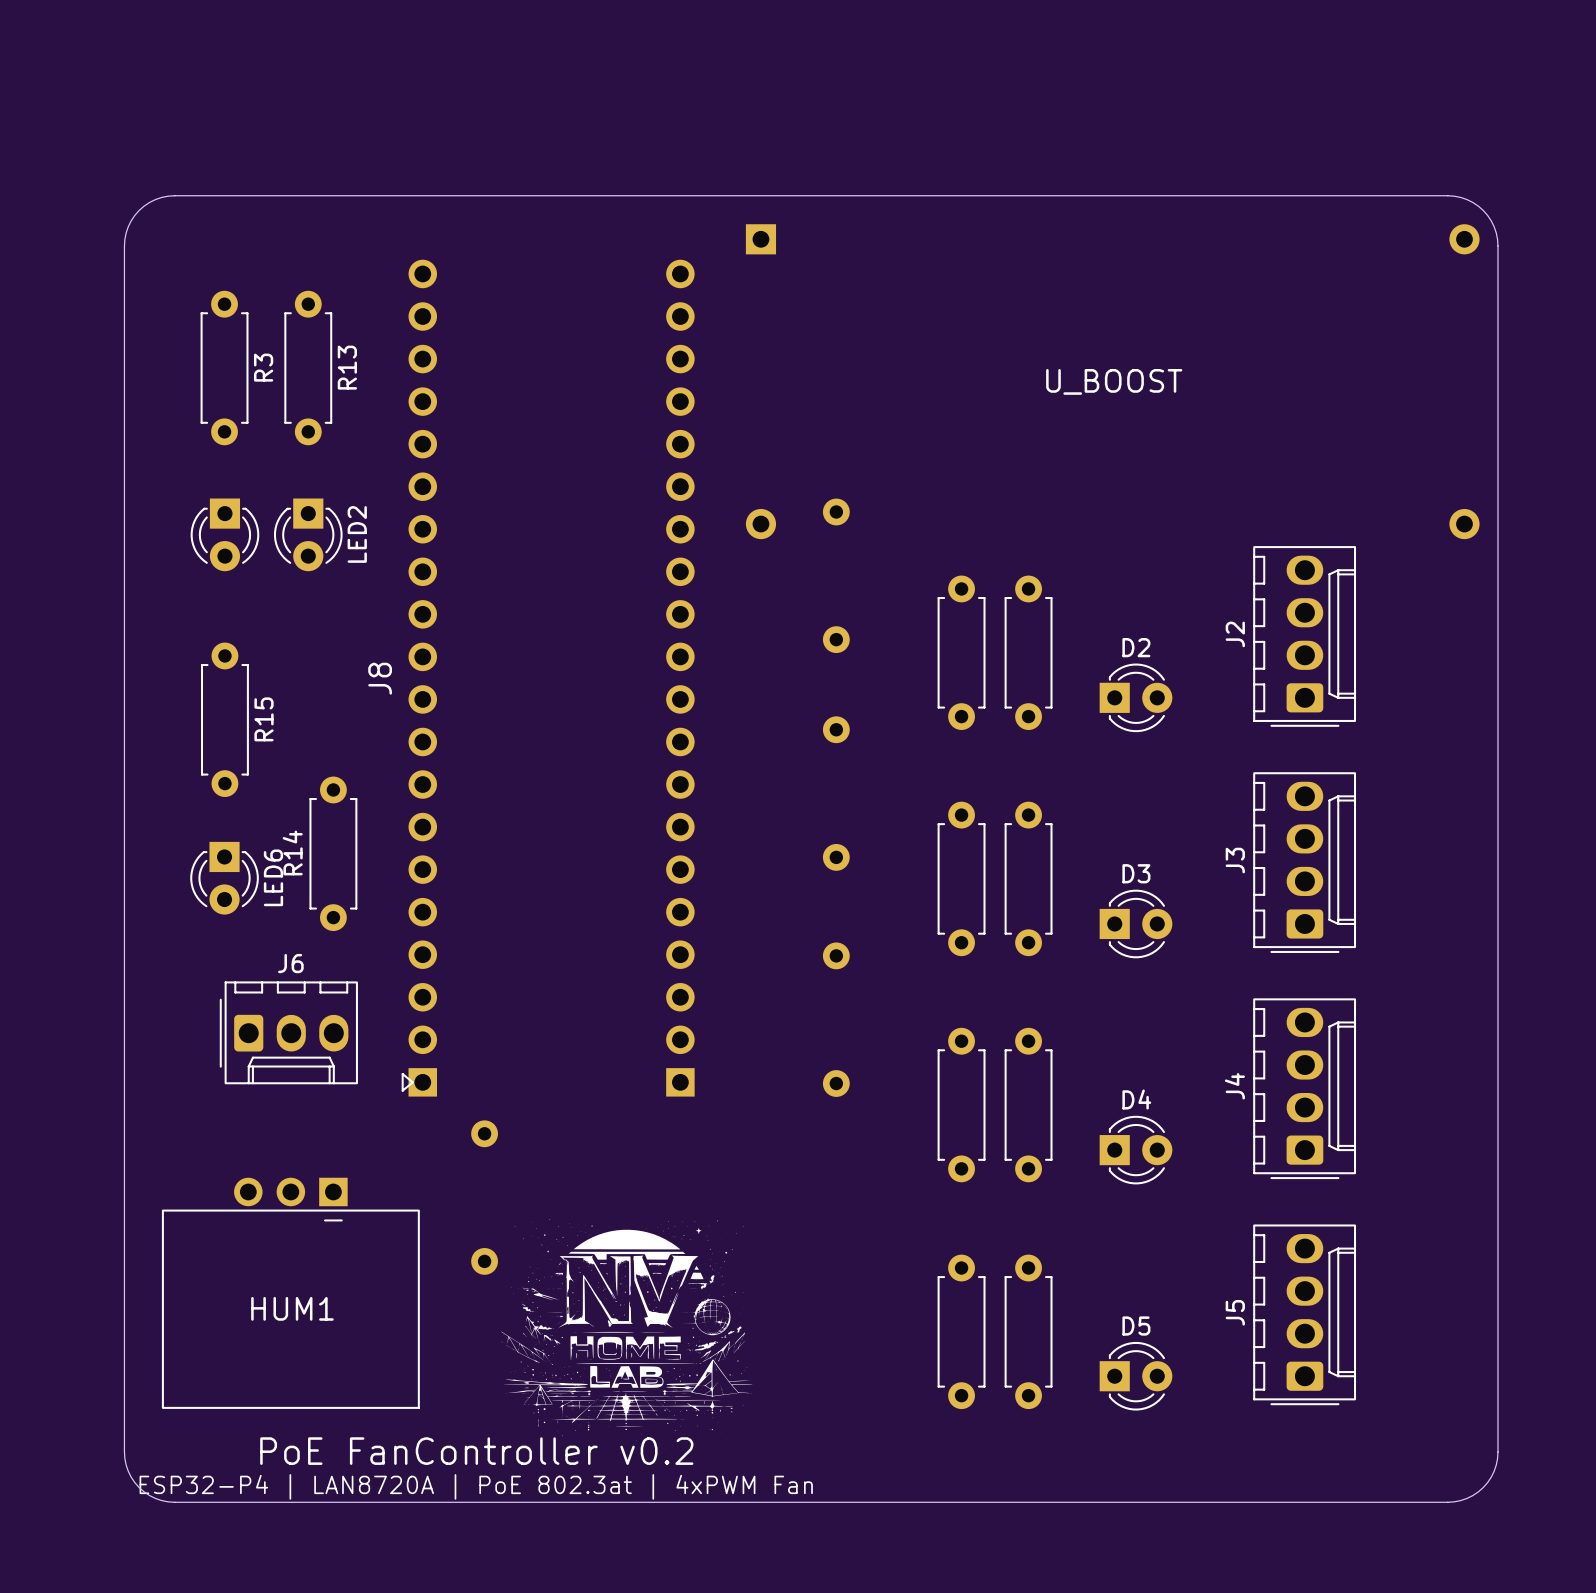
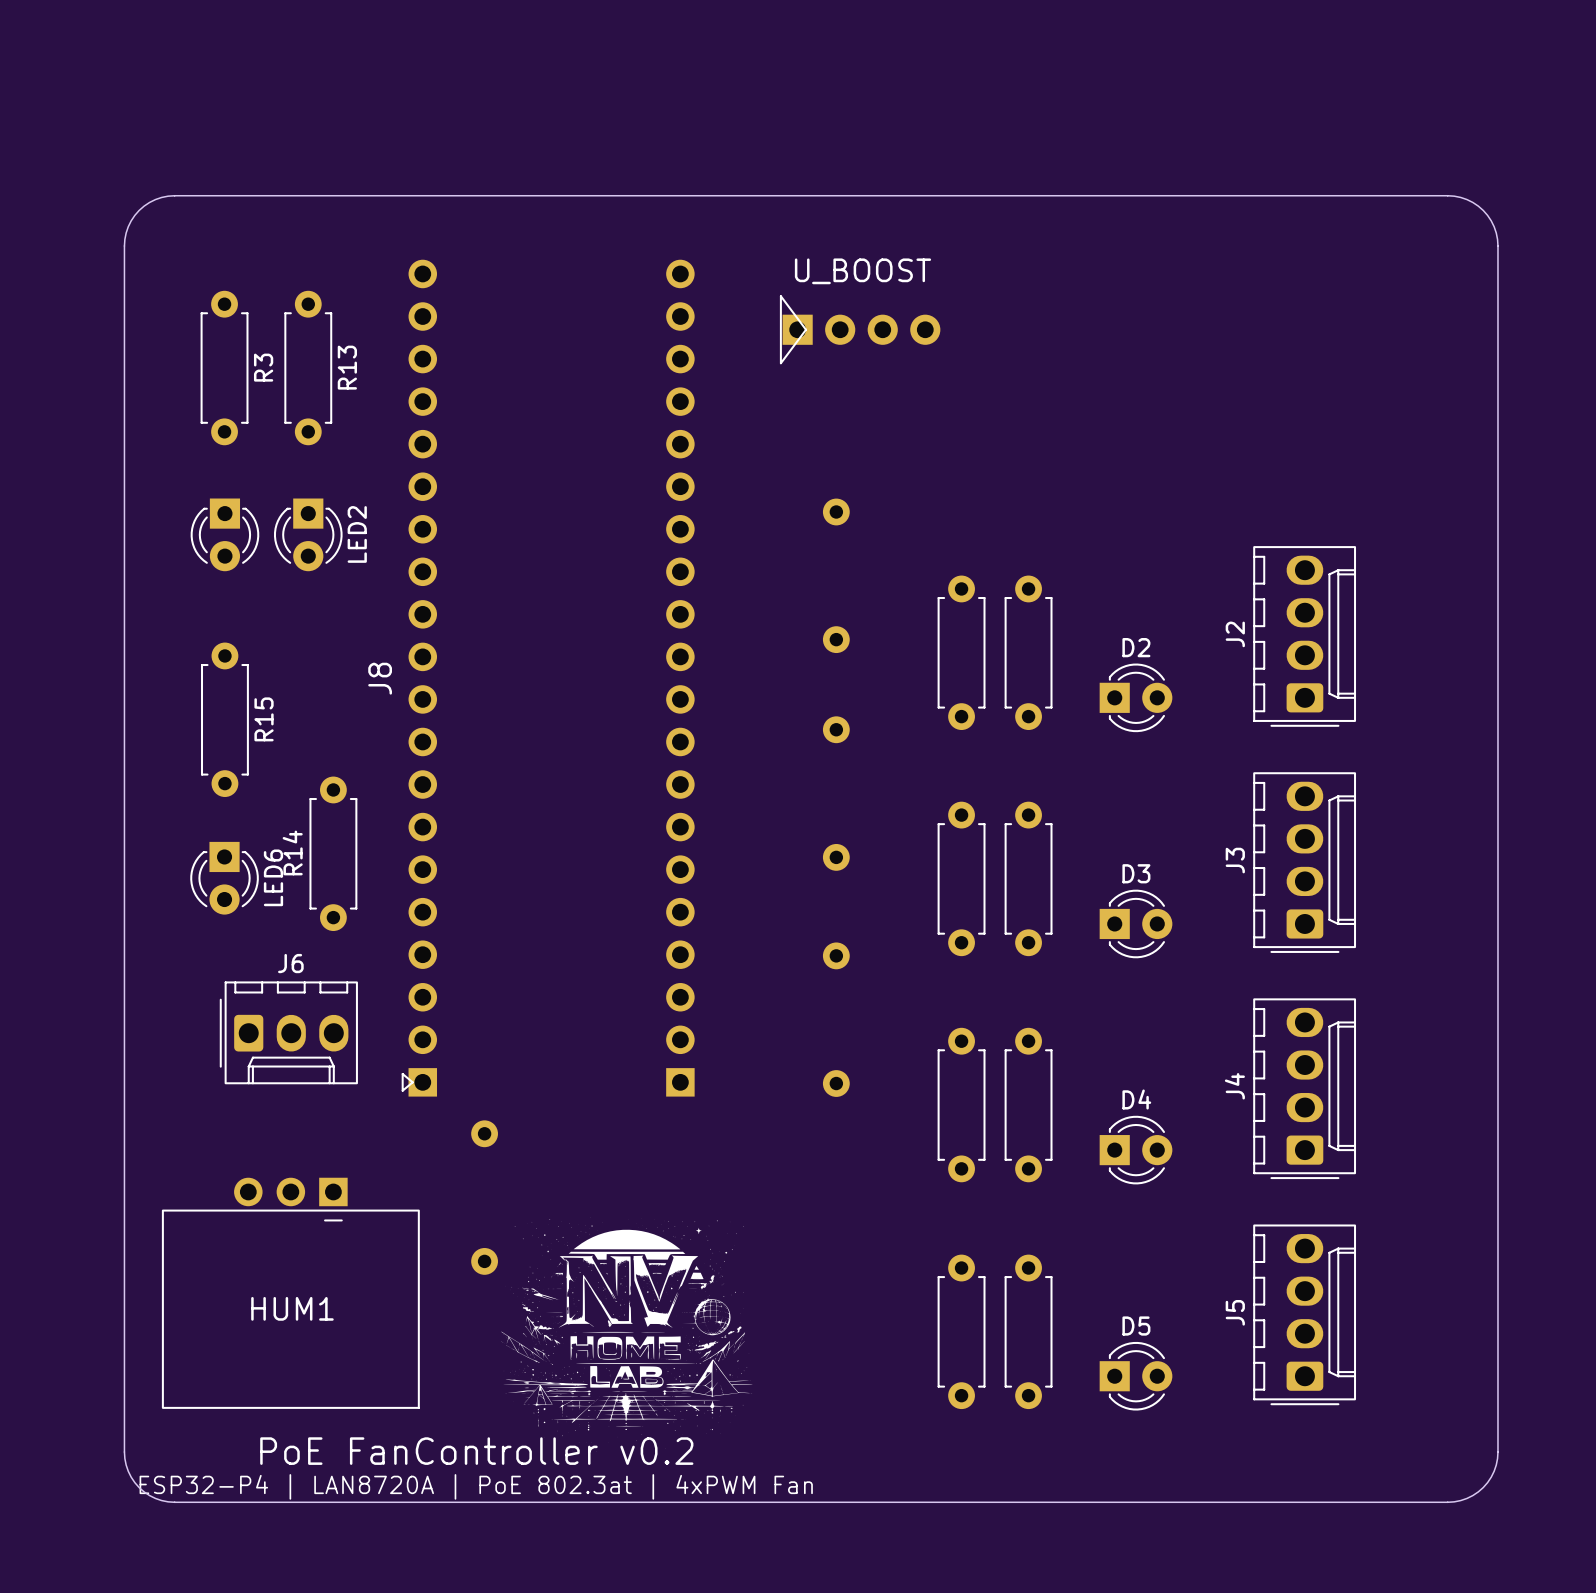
U_BOOST: none -> (860, 329)
U_BOOST: (1112, 381) -> none

